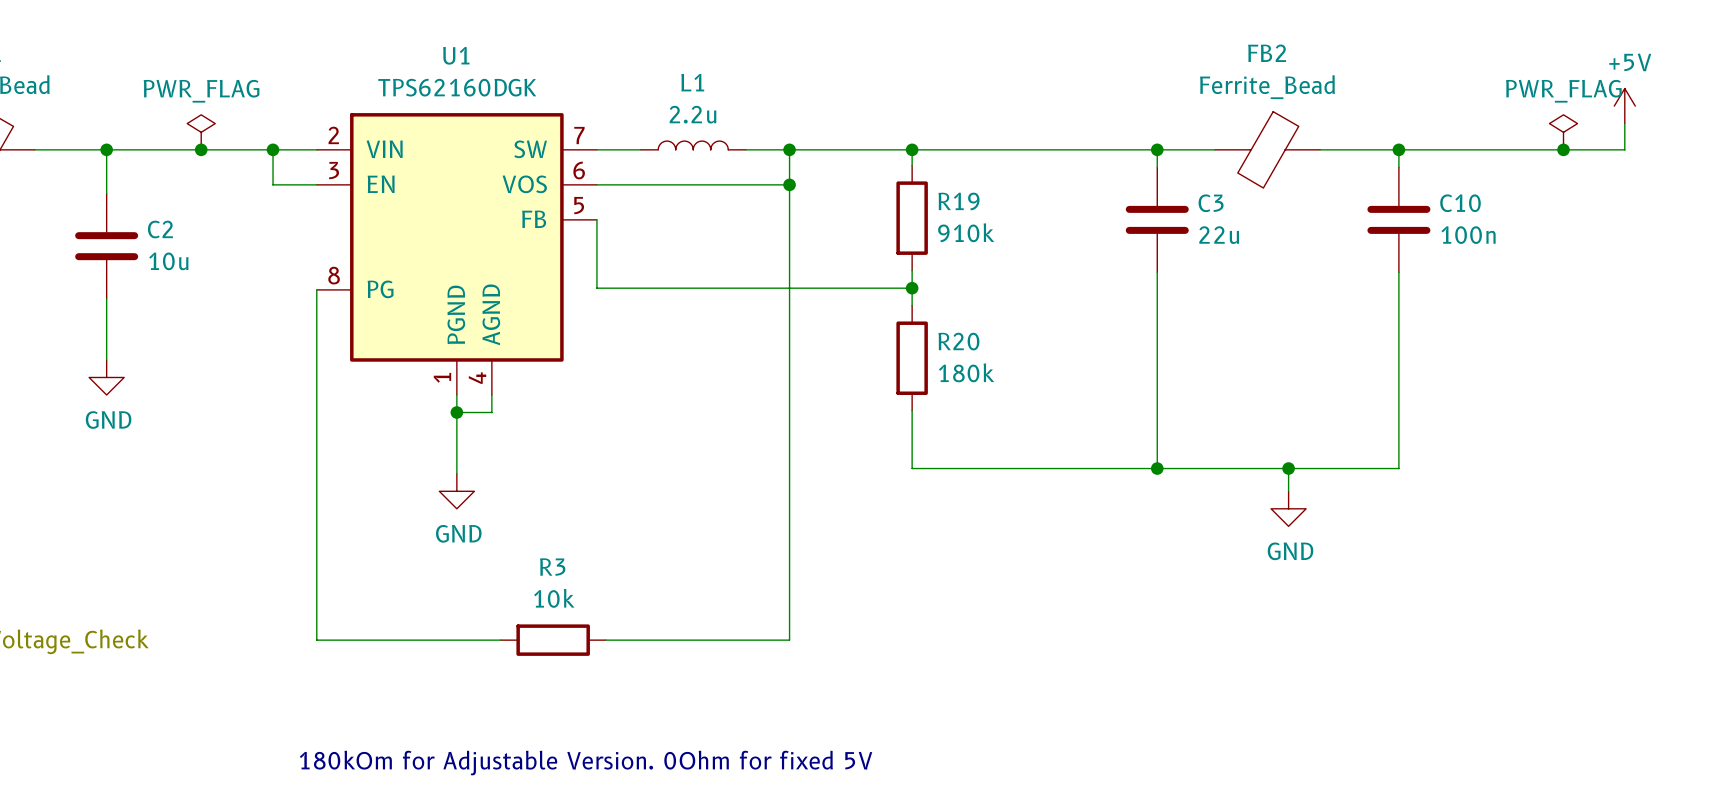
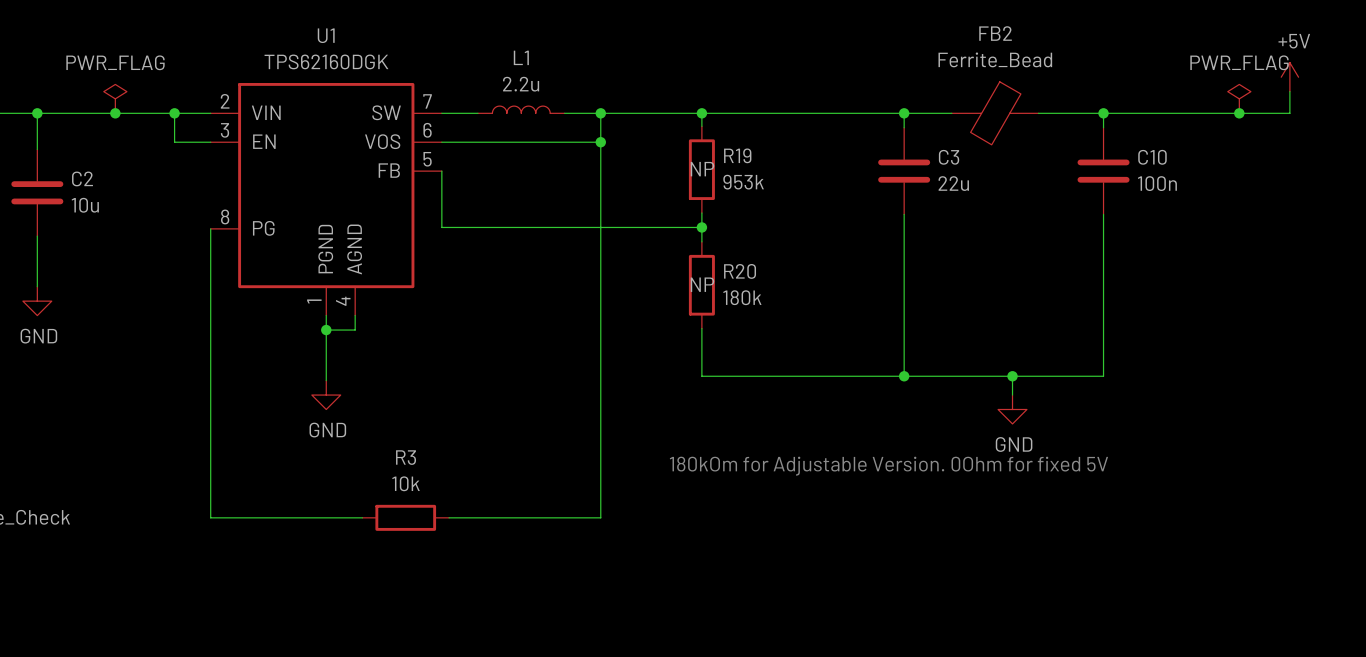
R19 text: none -> NP (702, 169)
R19 value: 910k (966, 232) -> 953k (743, 182)
R20 text: none -> NP (702, 284)
text: none -> 180kOm for Adjustable Version. 0Ohm for fixed 5V (888, 466)
text: 180kOm for Adjustable Version. 0Ohm for fixed 5V (586, 763) -> none

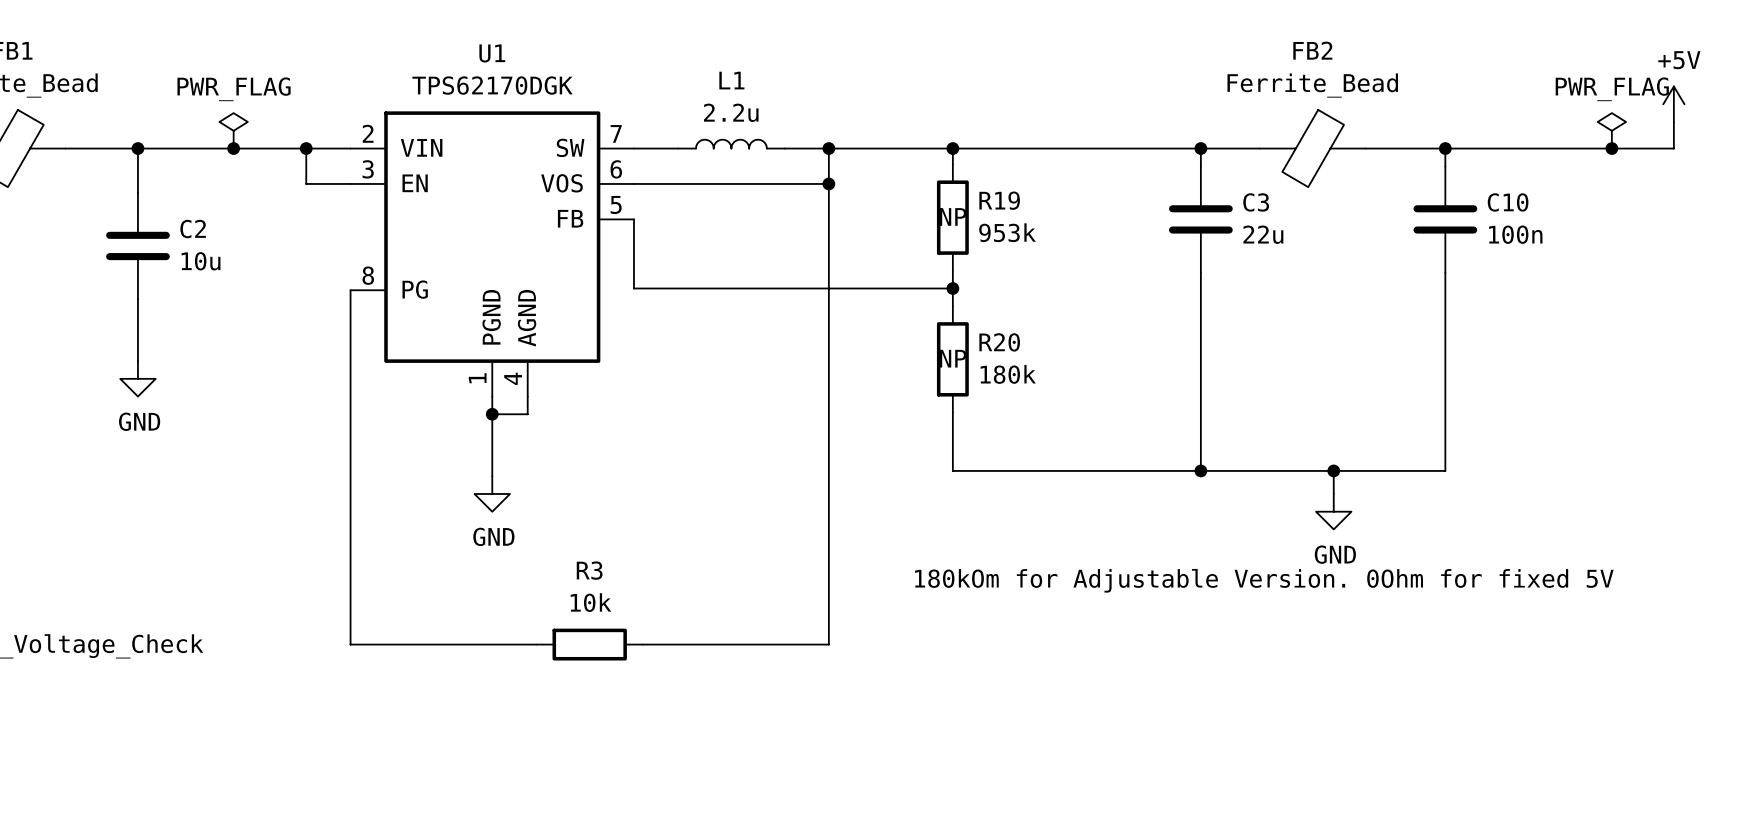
U1 value: TPS62160DGK (326, 61) -> TPS62170DGK (492, 85)

